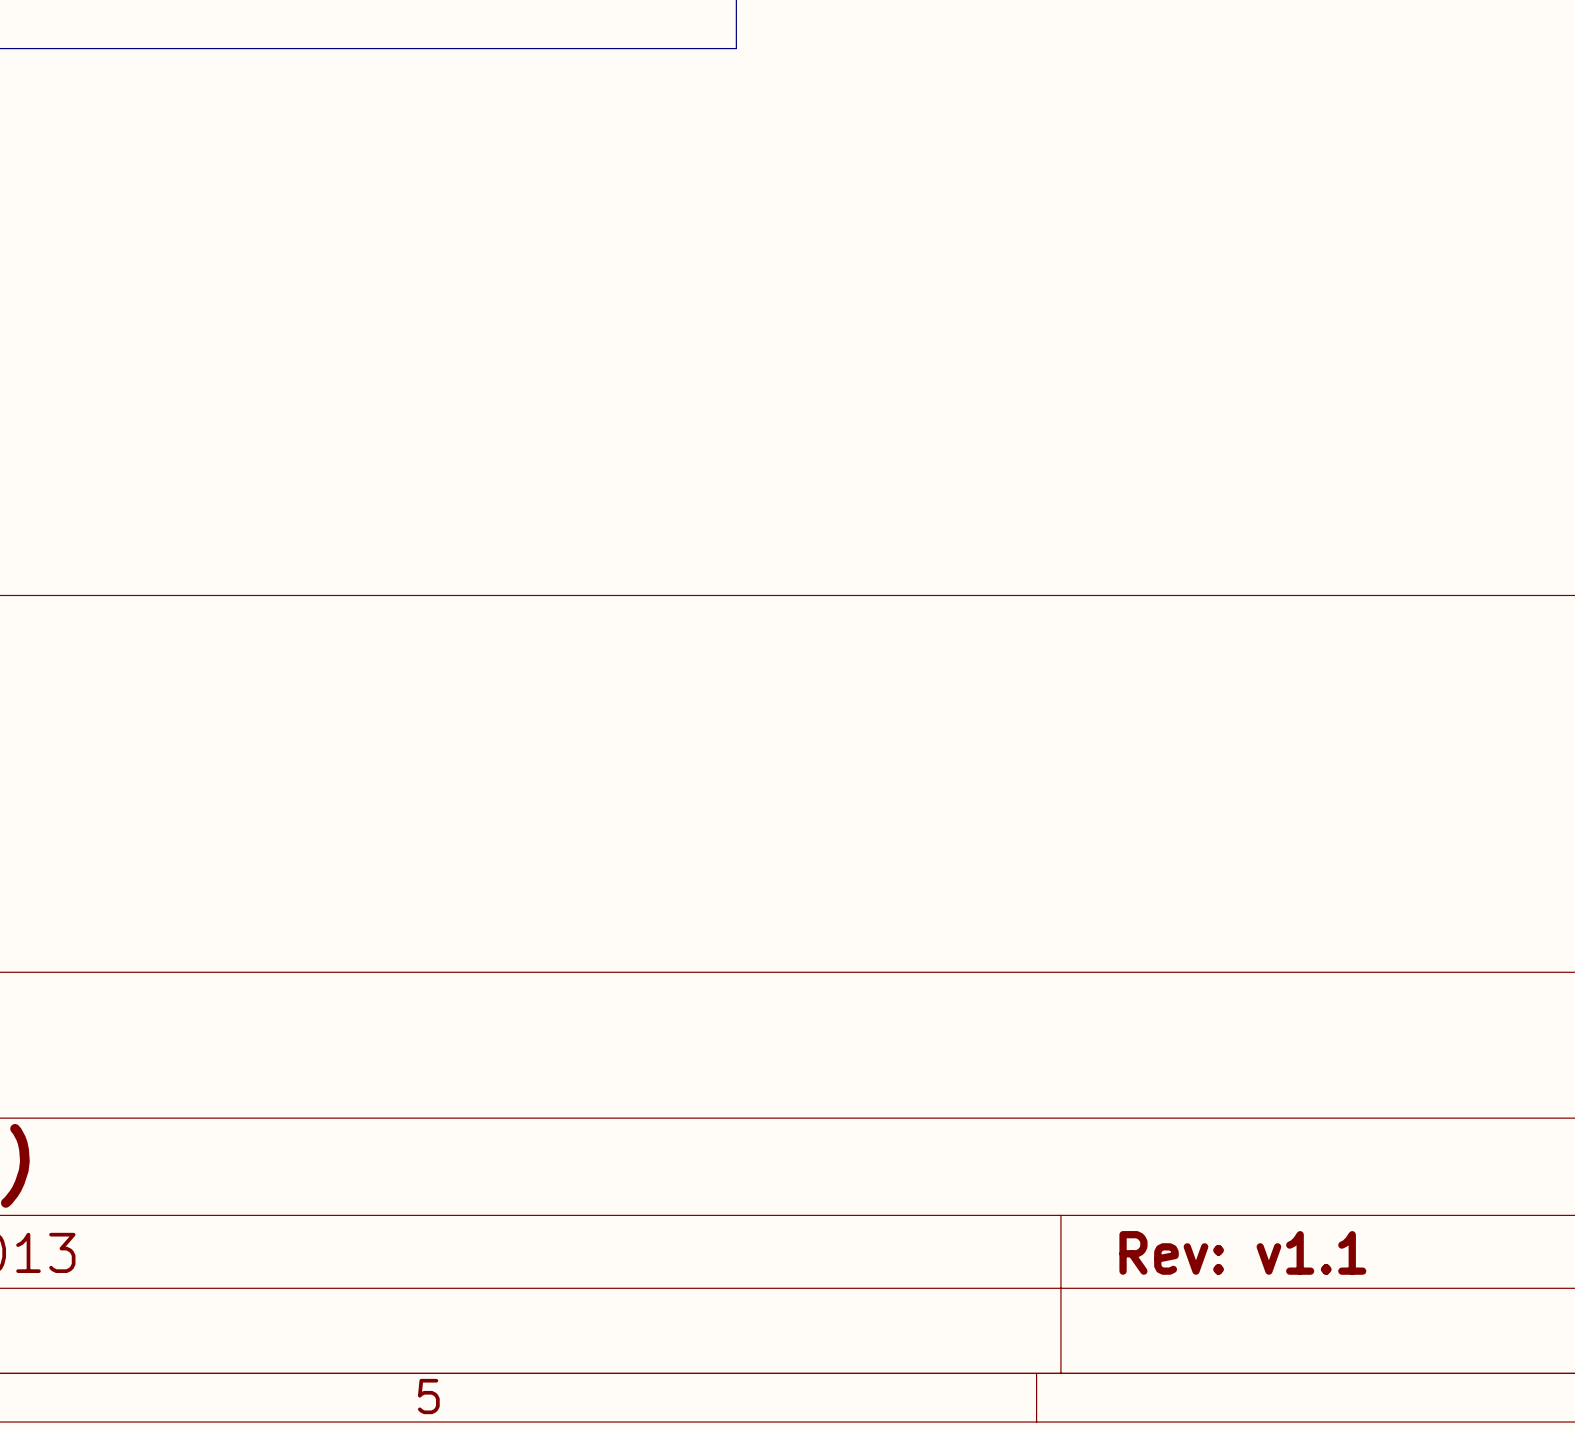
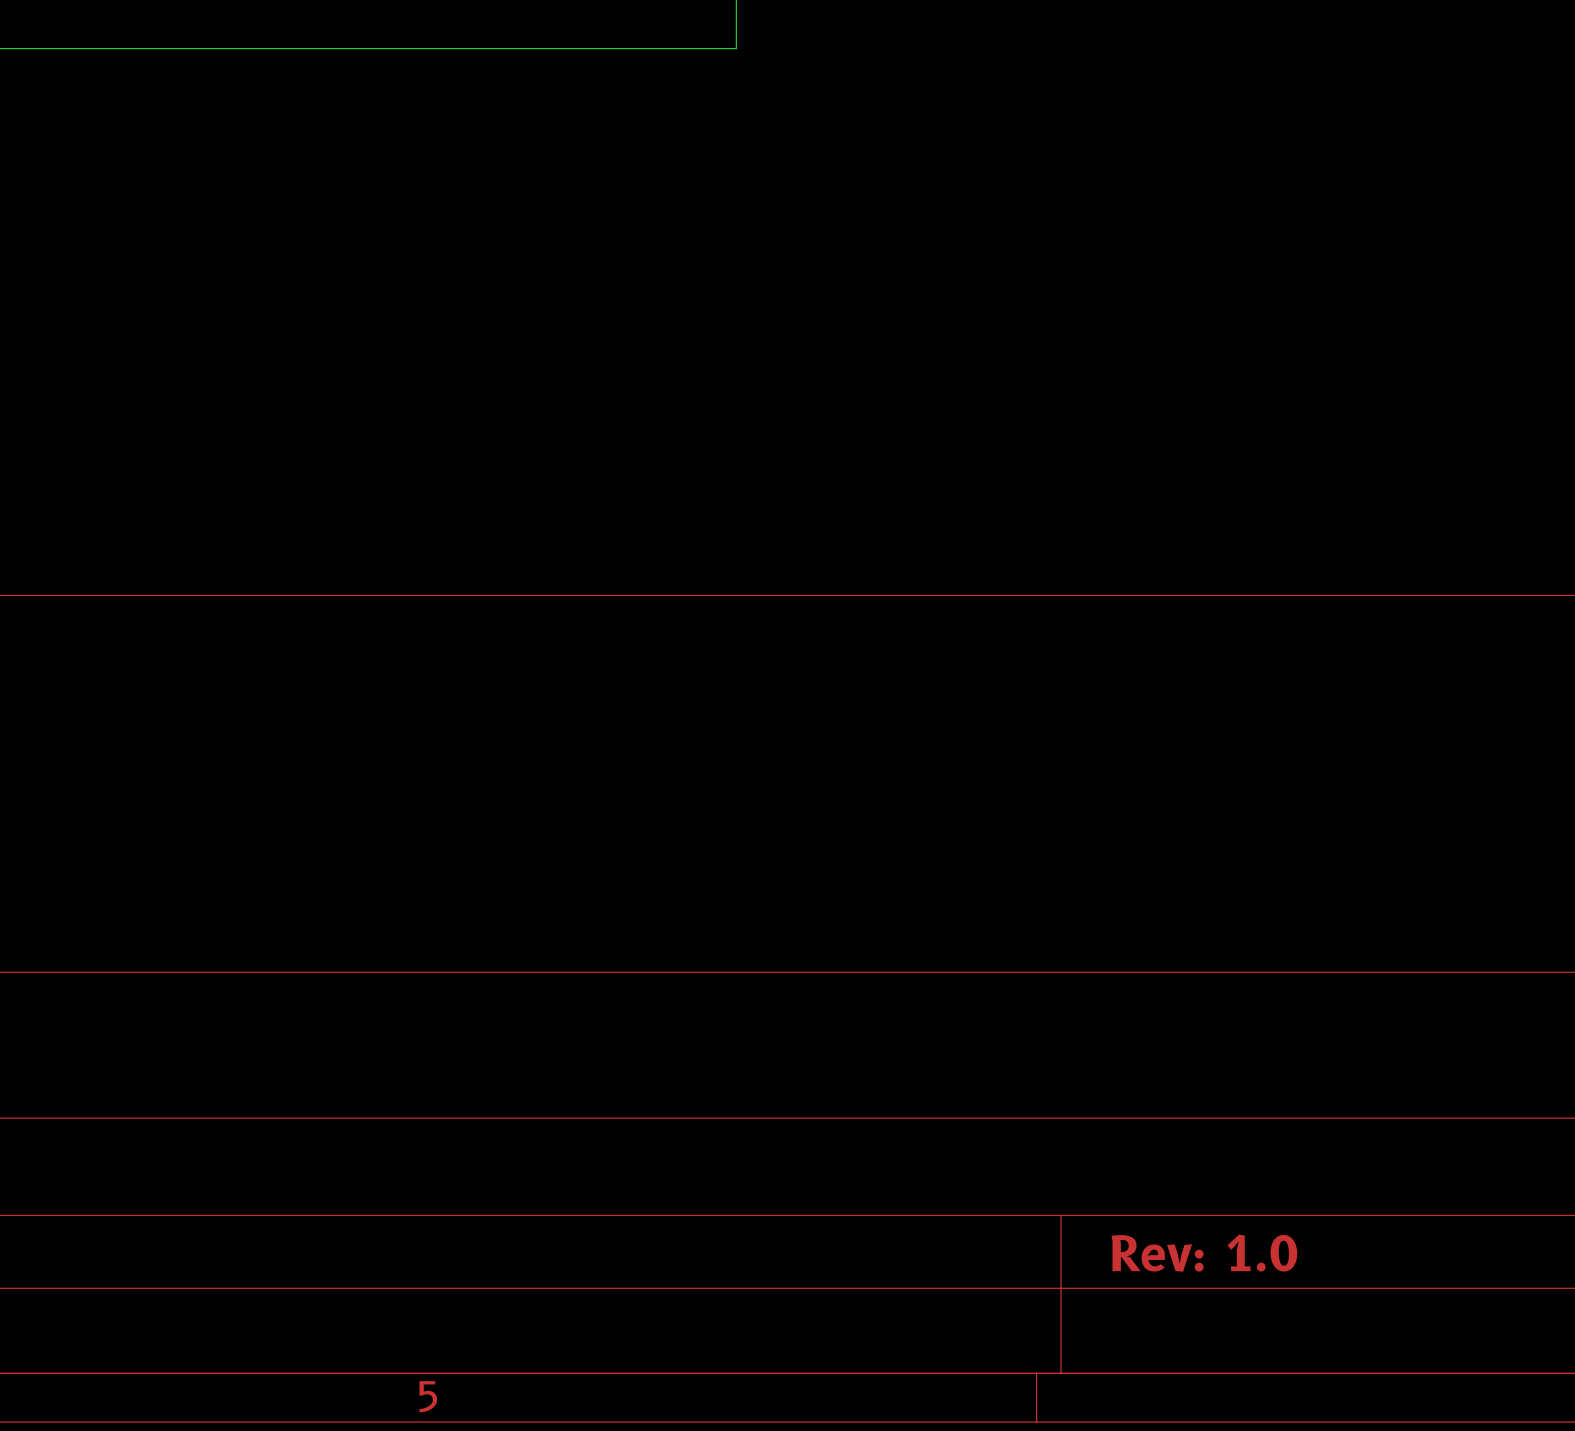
title block: Rev: v1.1 (1242, 1252) -> Rev: 1.0 (1204, 1253)

